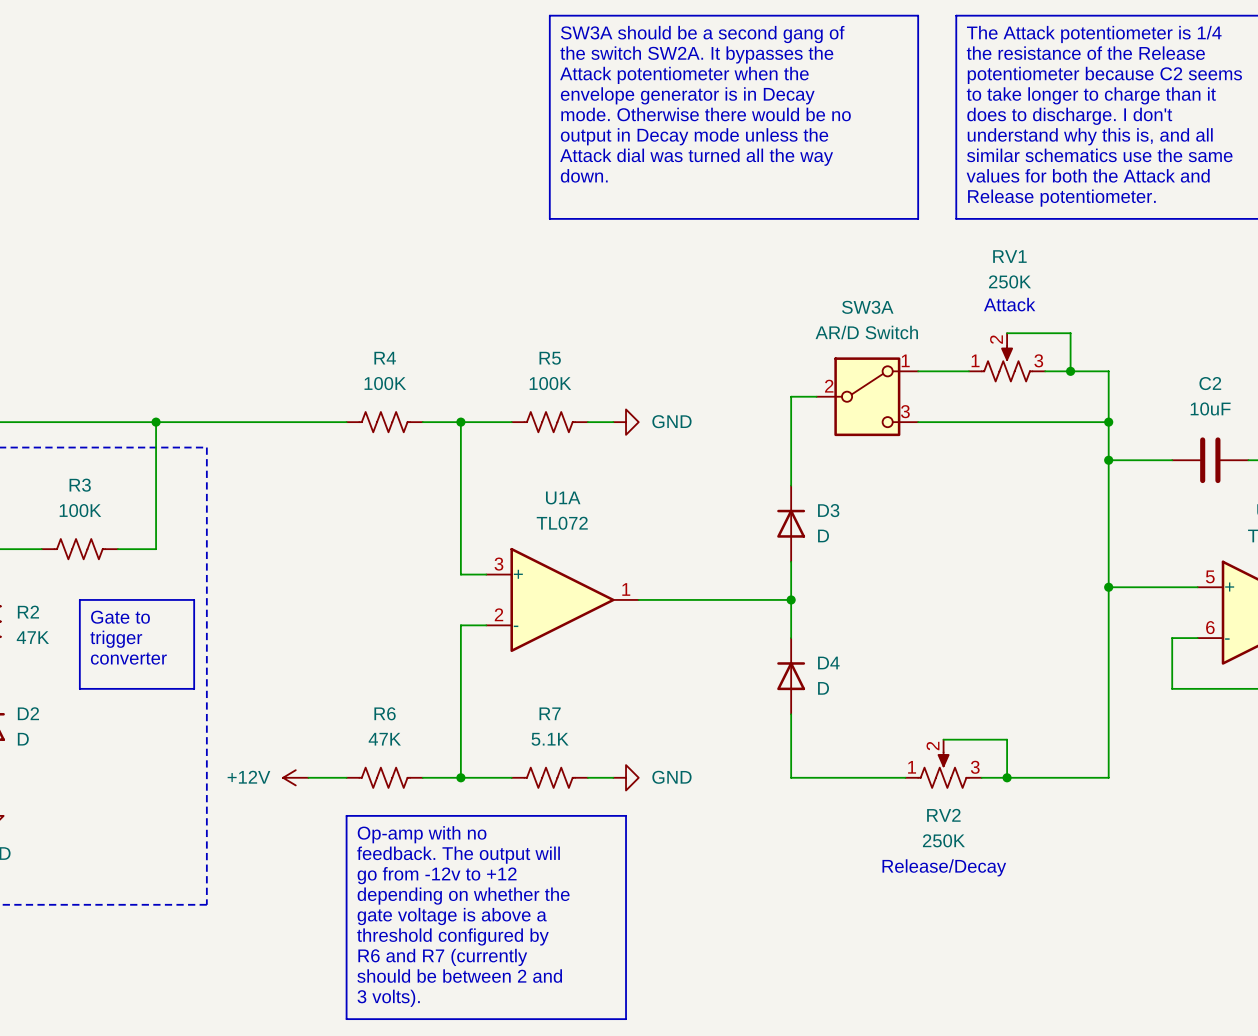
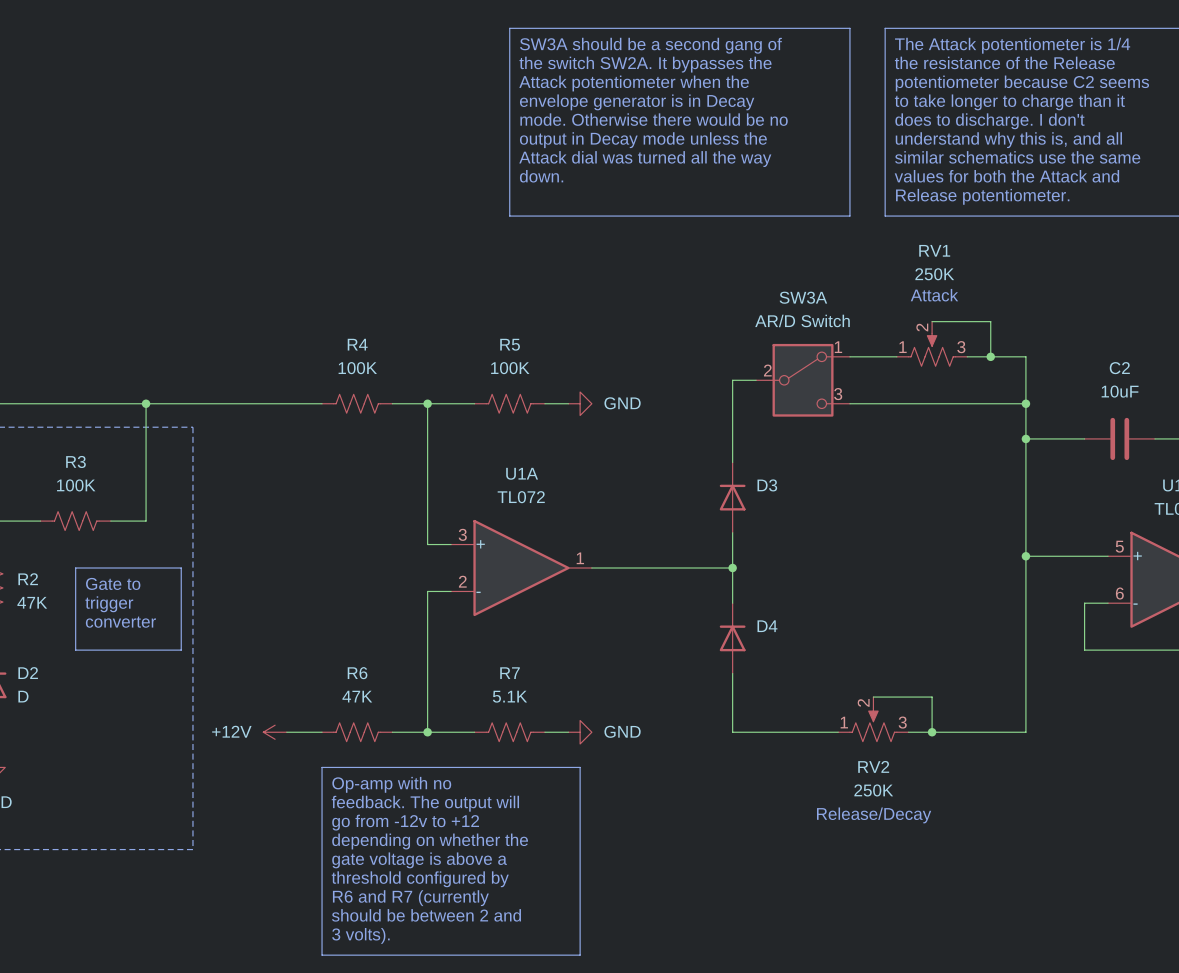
D3 value: D (823, 535) -> none
D4 value: D (823, 688) -> none

